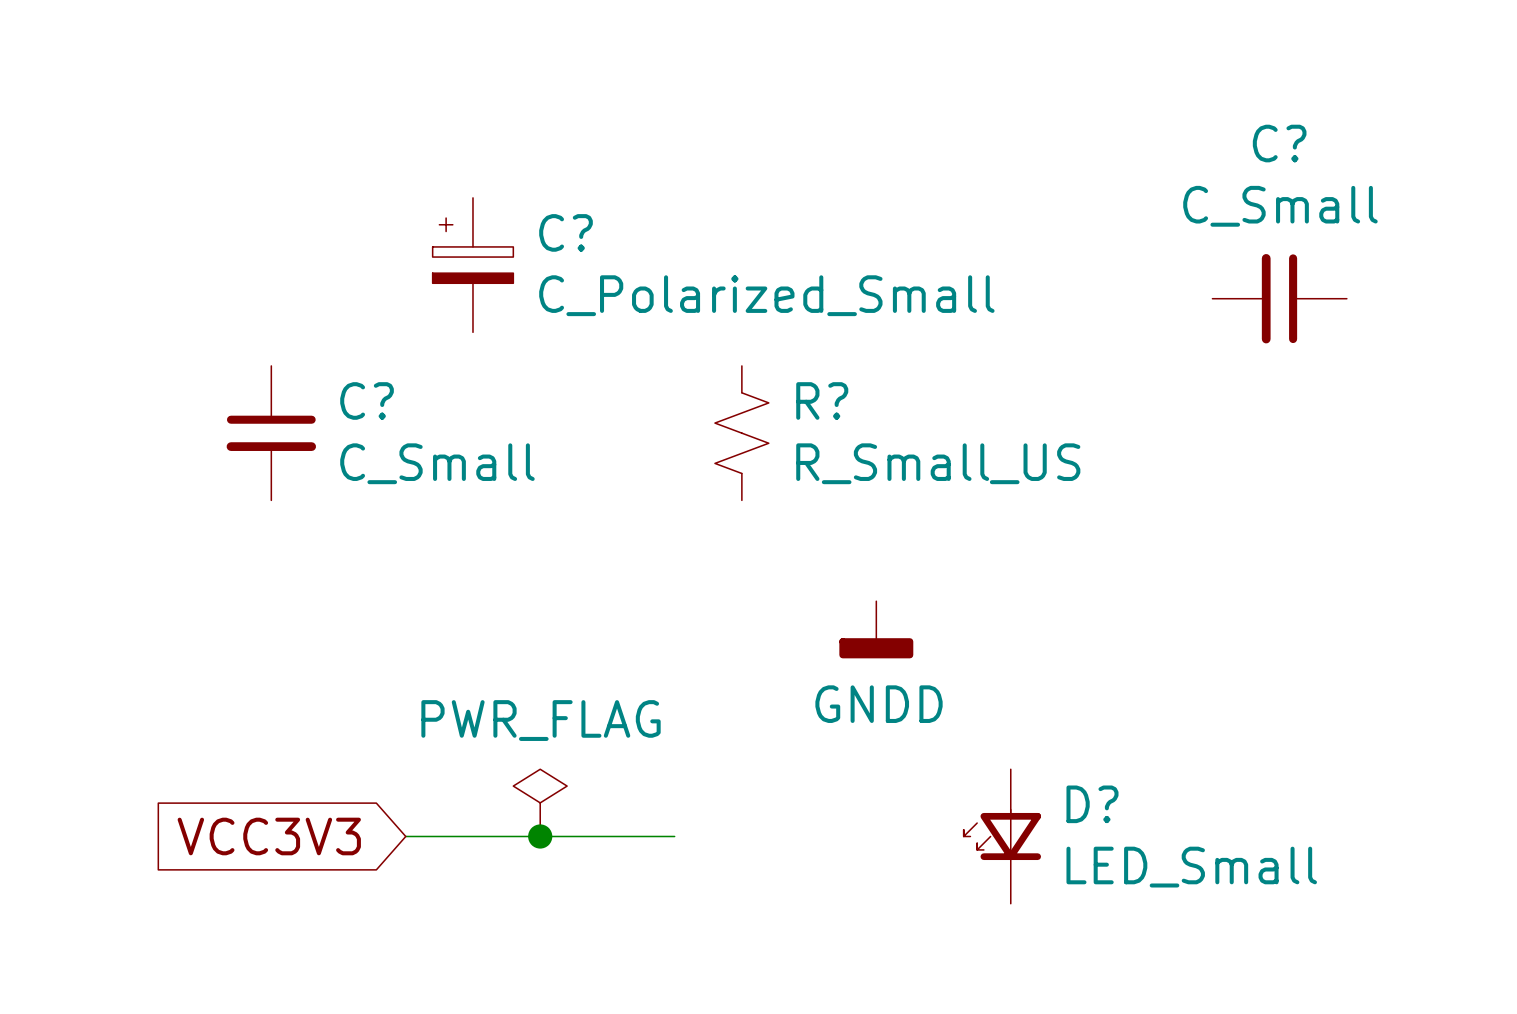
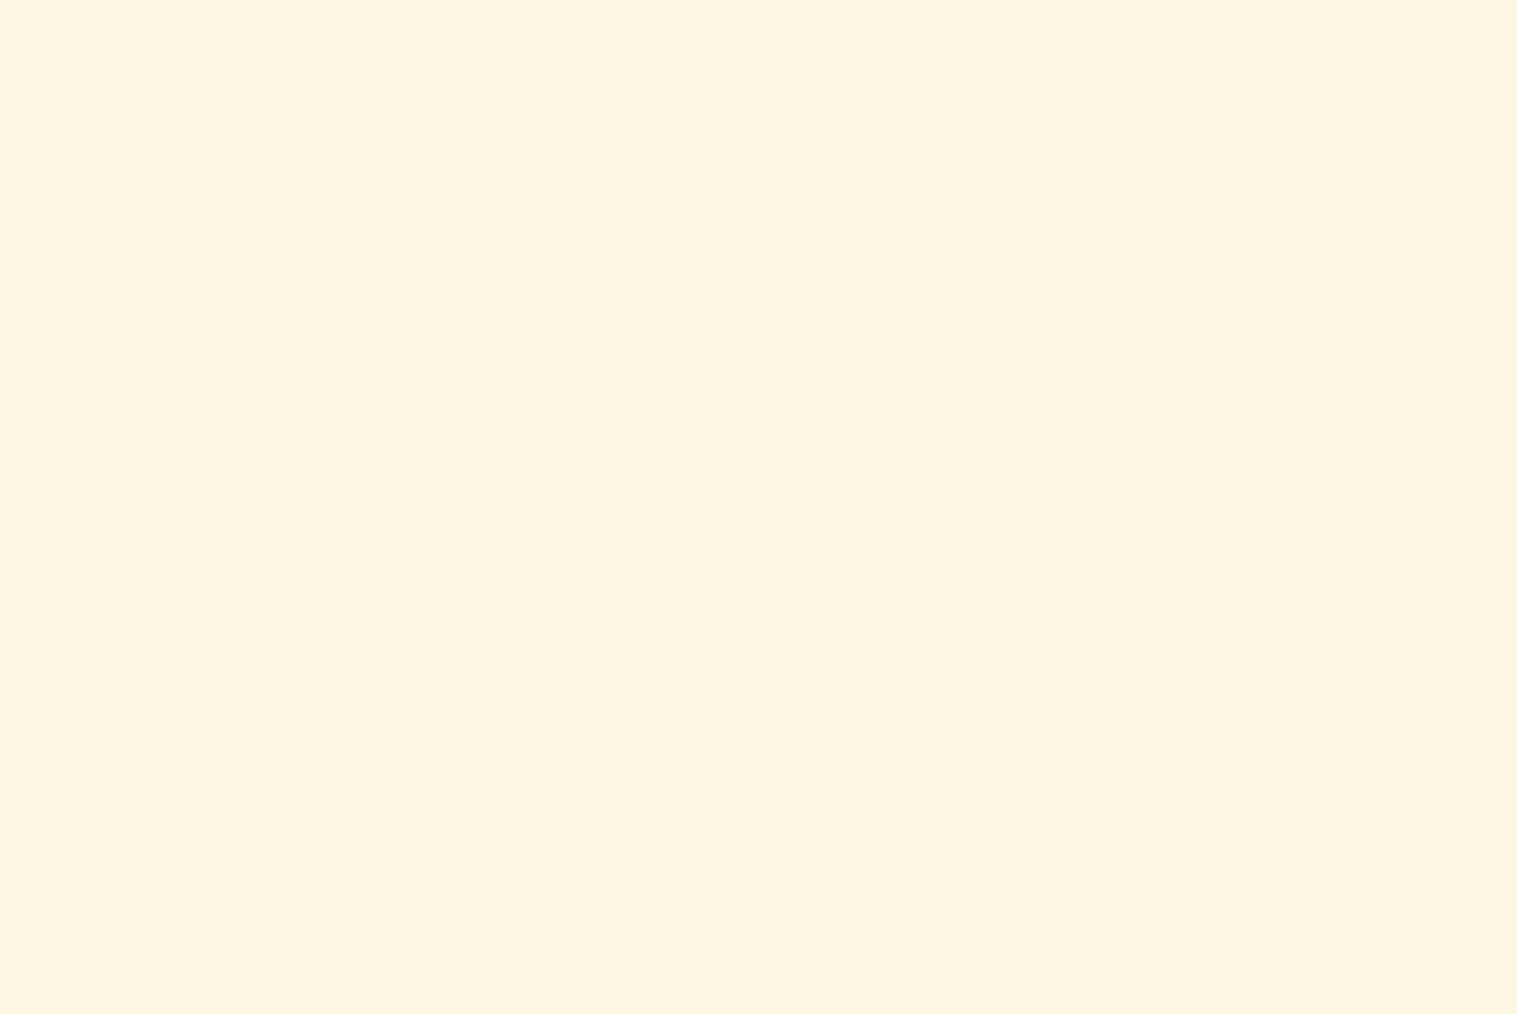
C?: C_Polarized_Small (472, 265) -> none
C?: C_Small (1279, 298) -> none
C?: C_Small (271, 433) -> none
R?: R_Small_US (741, 433) -> none
power symbol: GNDD (876, 629) -> none
power symbol: PWR_FLAG (540, 802) -> none
global label: VCC3V3 (269, 836) -> none
wire: (405, 836) (674, 836) -> none
junction: (540, 836) -> none
D?: LED_Small (1002, 836) -> none

